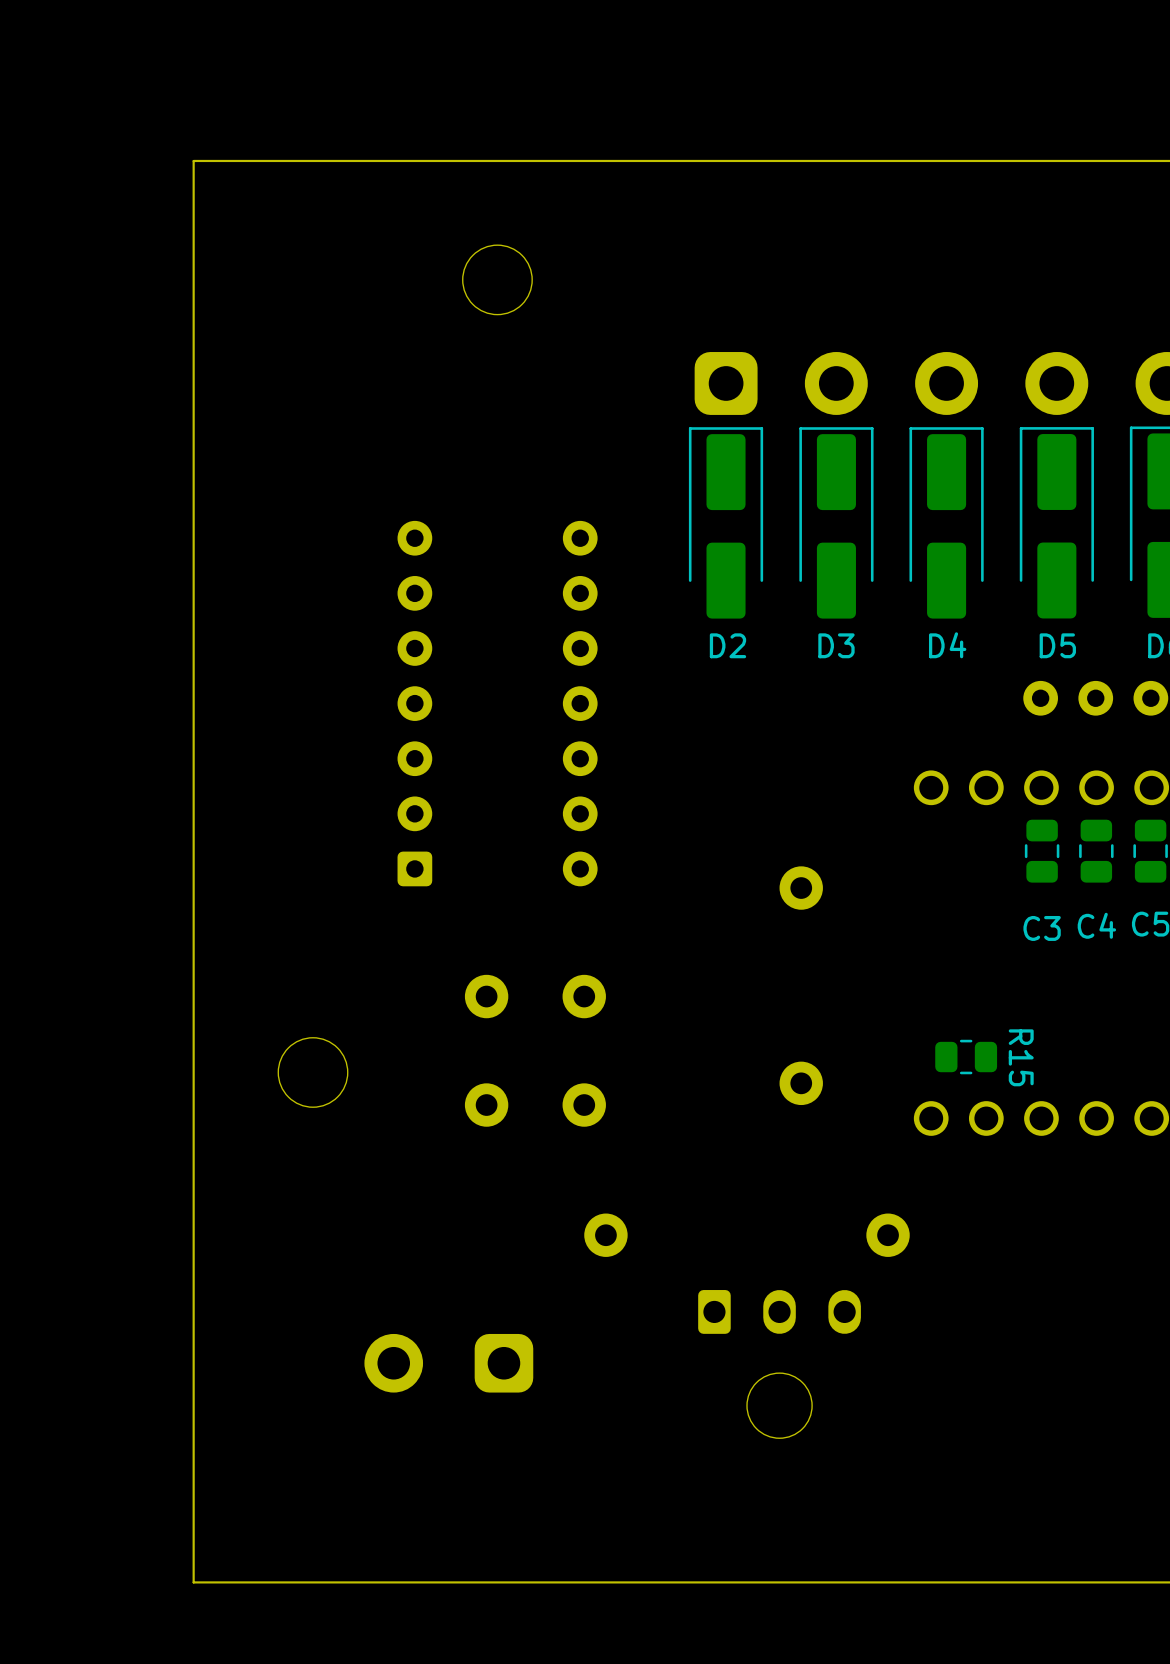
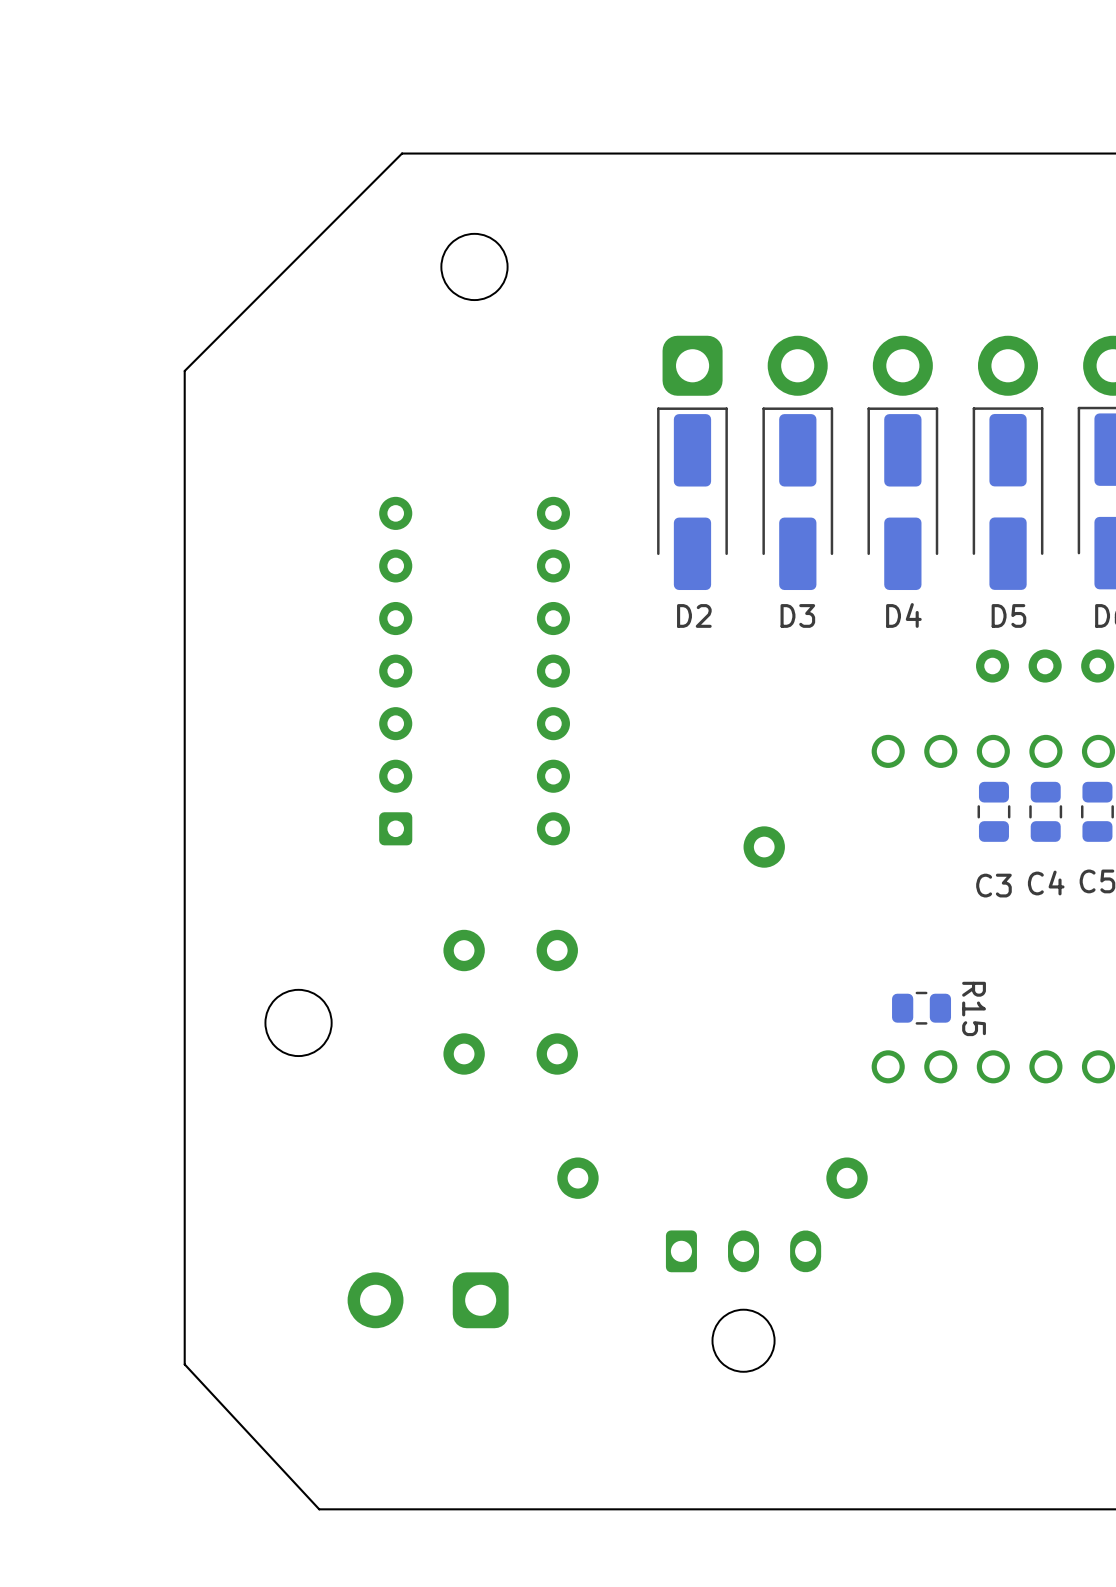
board edge: (421, 160) (193, 160) -> none
board edge: (193, 161) (193, 388) -> (402, 153) (184, 370)
part: (801, 1083) -> none
board edge: (193, 1430) (193, 1582) (334, 1582) -> (184, 1364) (319, 1509)

